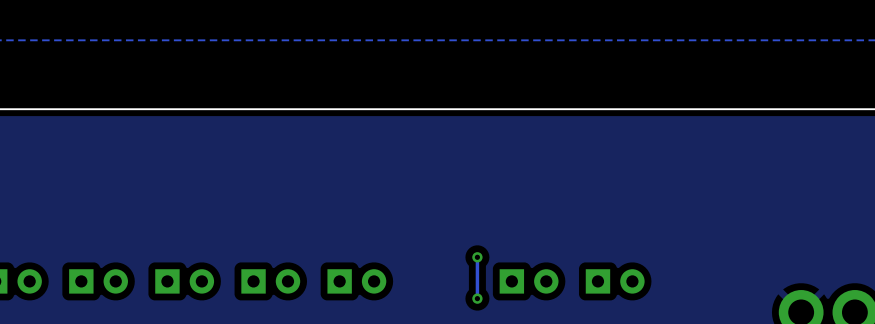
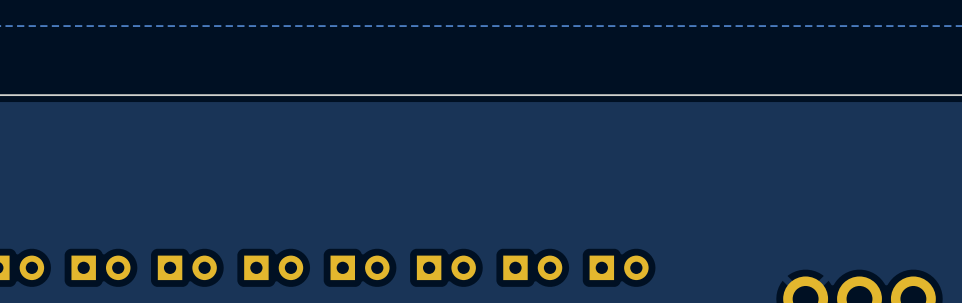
track: (477, 257) (477, 298) -> none
via: (477, 257) -> none
part: none -> (446, 267)
via: (477, 298) -> none

